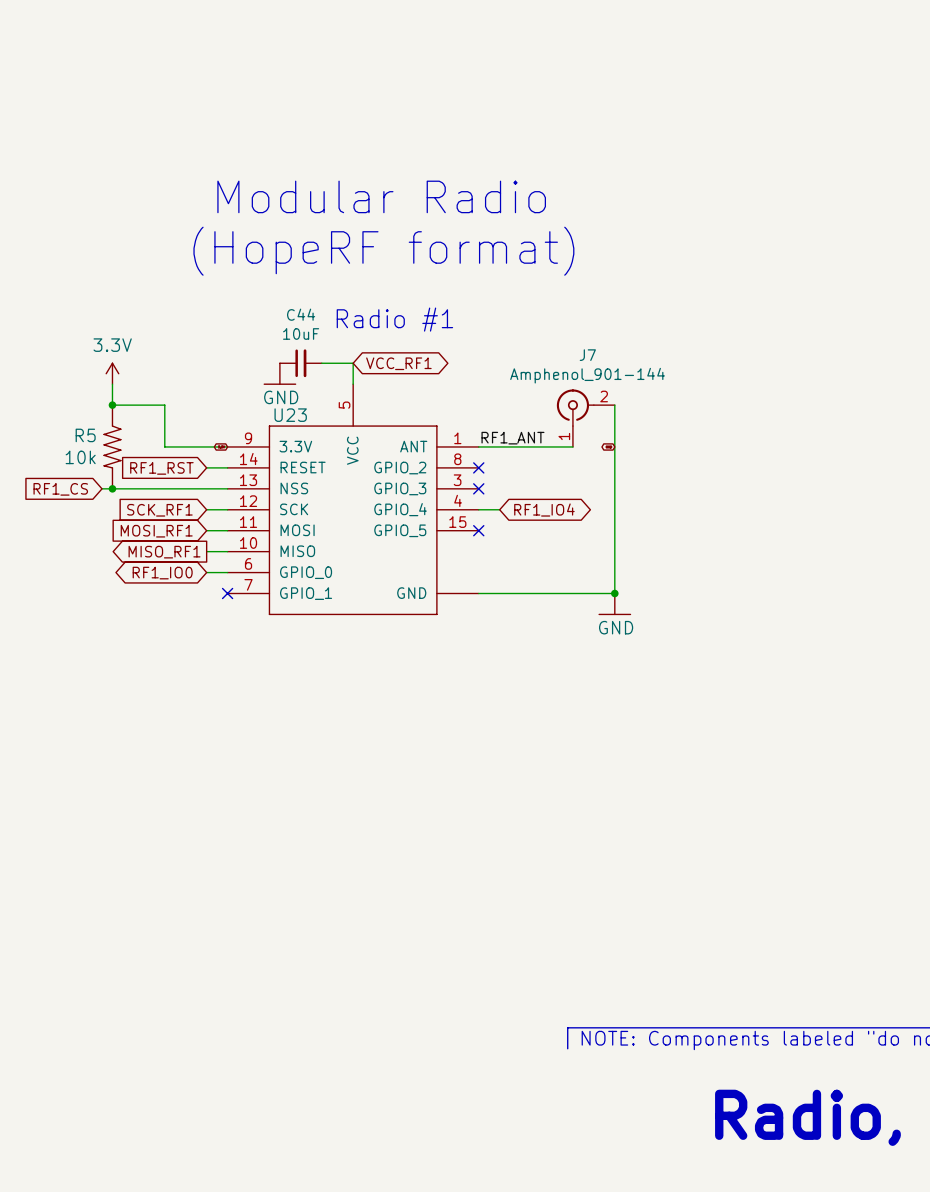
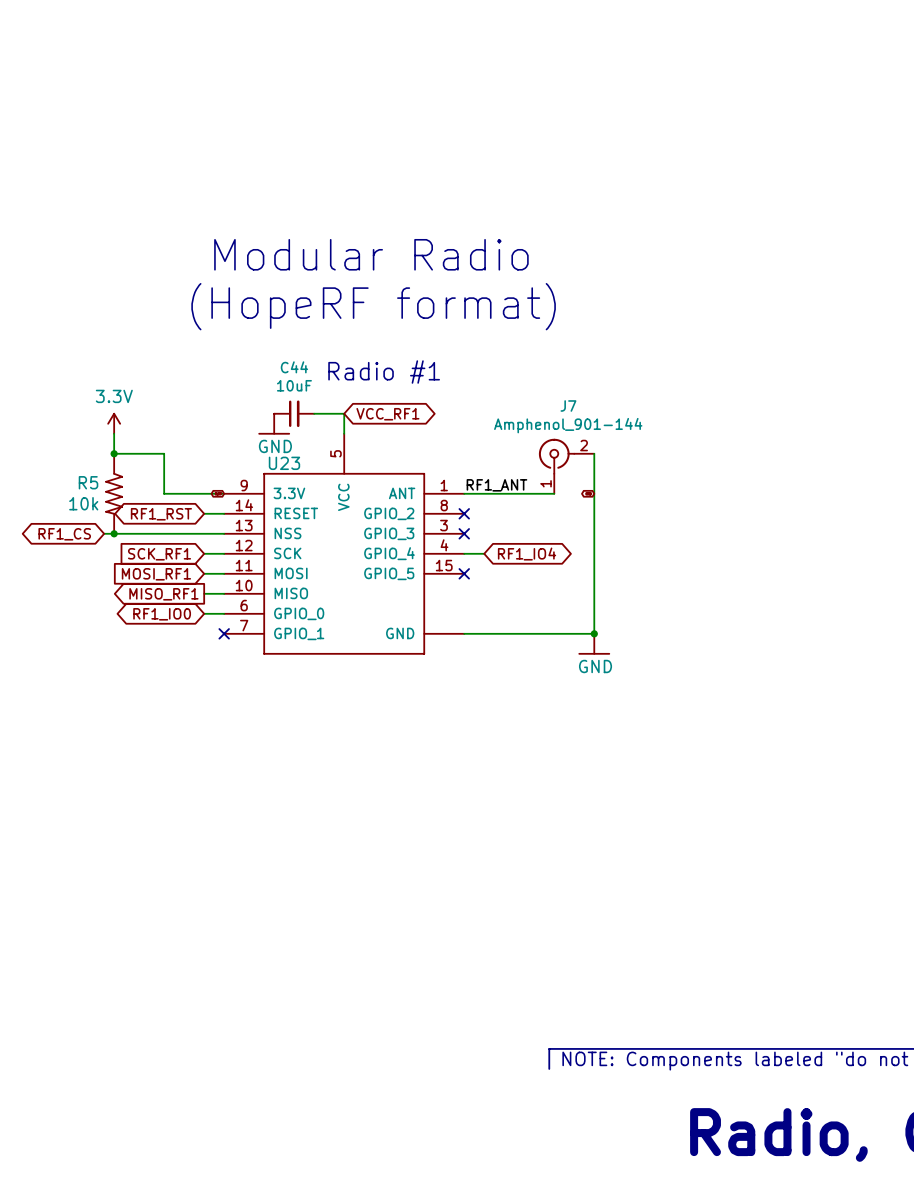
global label shape: input (161, 468) -> bidirectional (161, 514)
global label shape: input (60, 489) -> bidirectional (64, 534)

